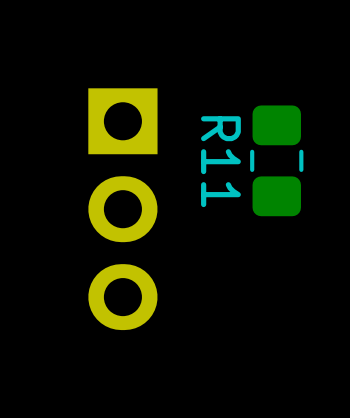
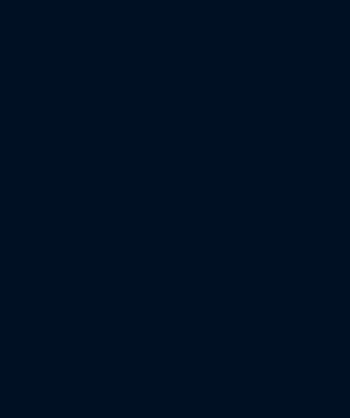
R11: (276, 160) -> none
part: (122, 209) -> none

